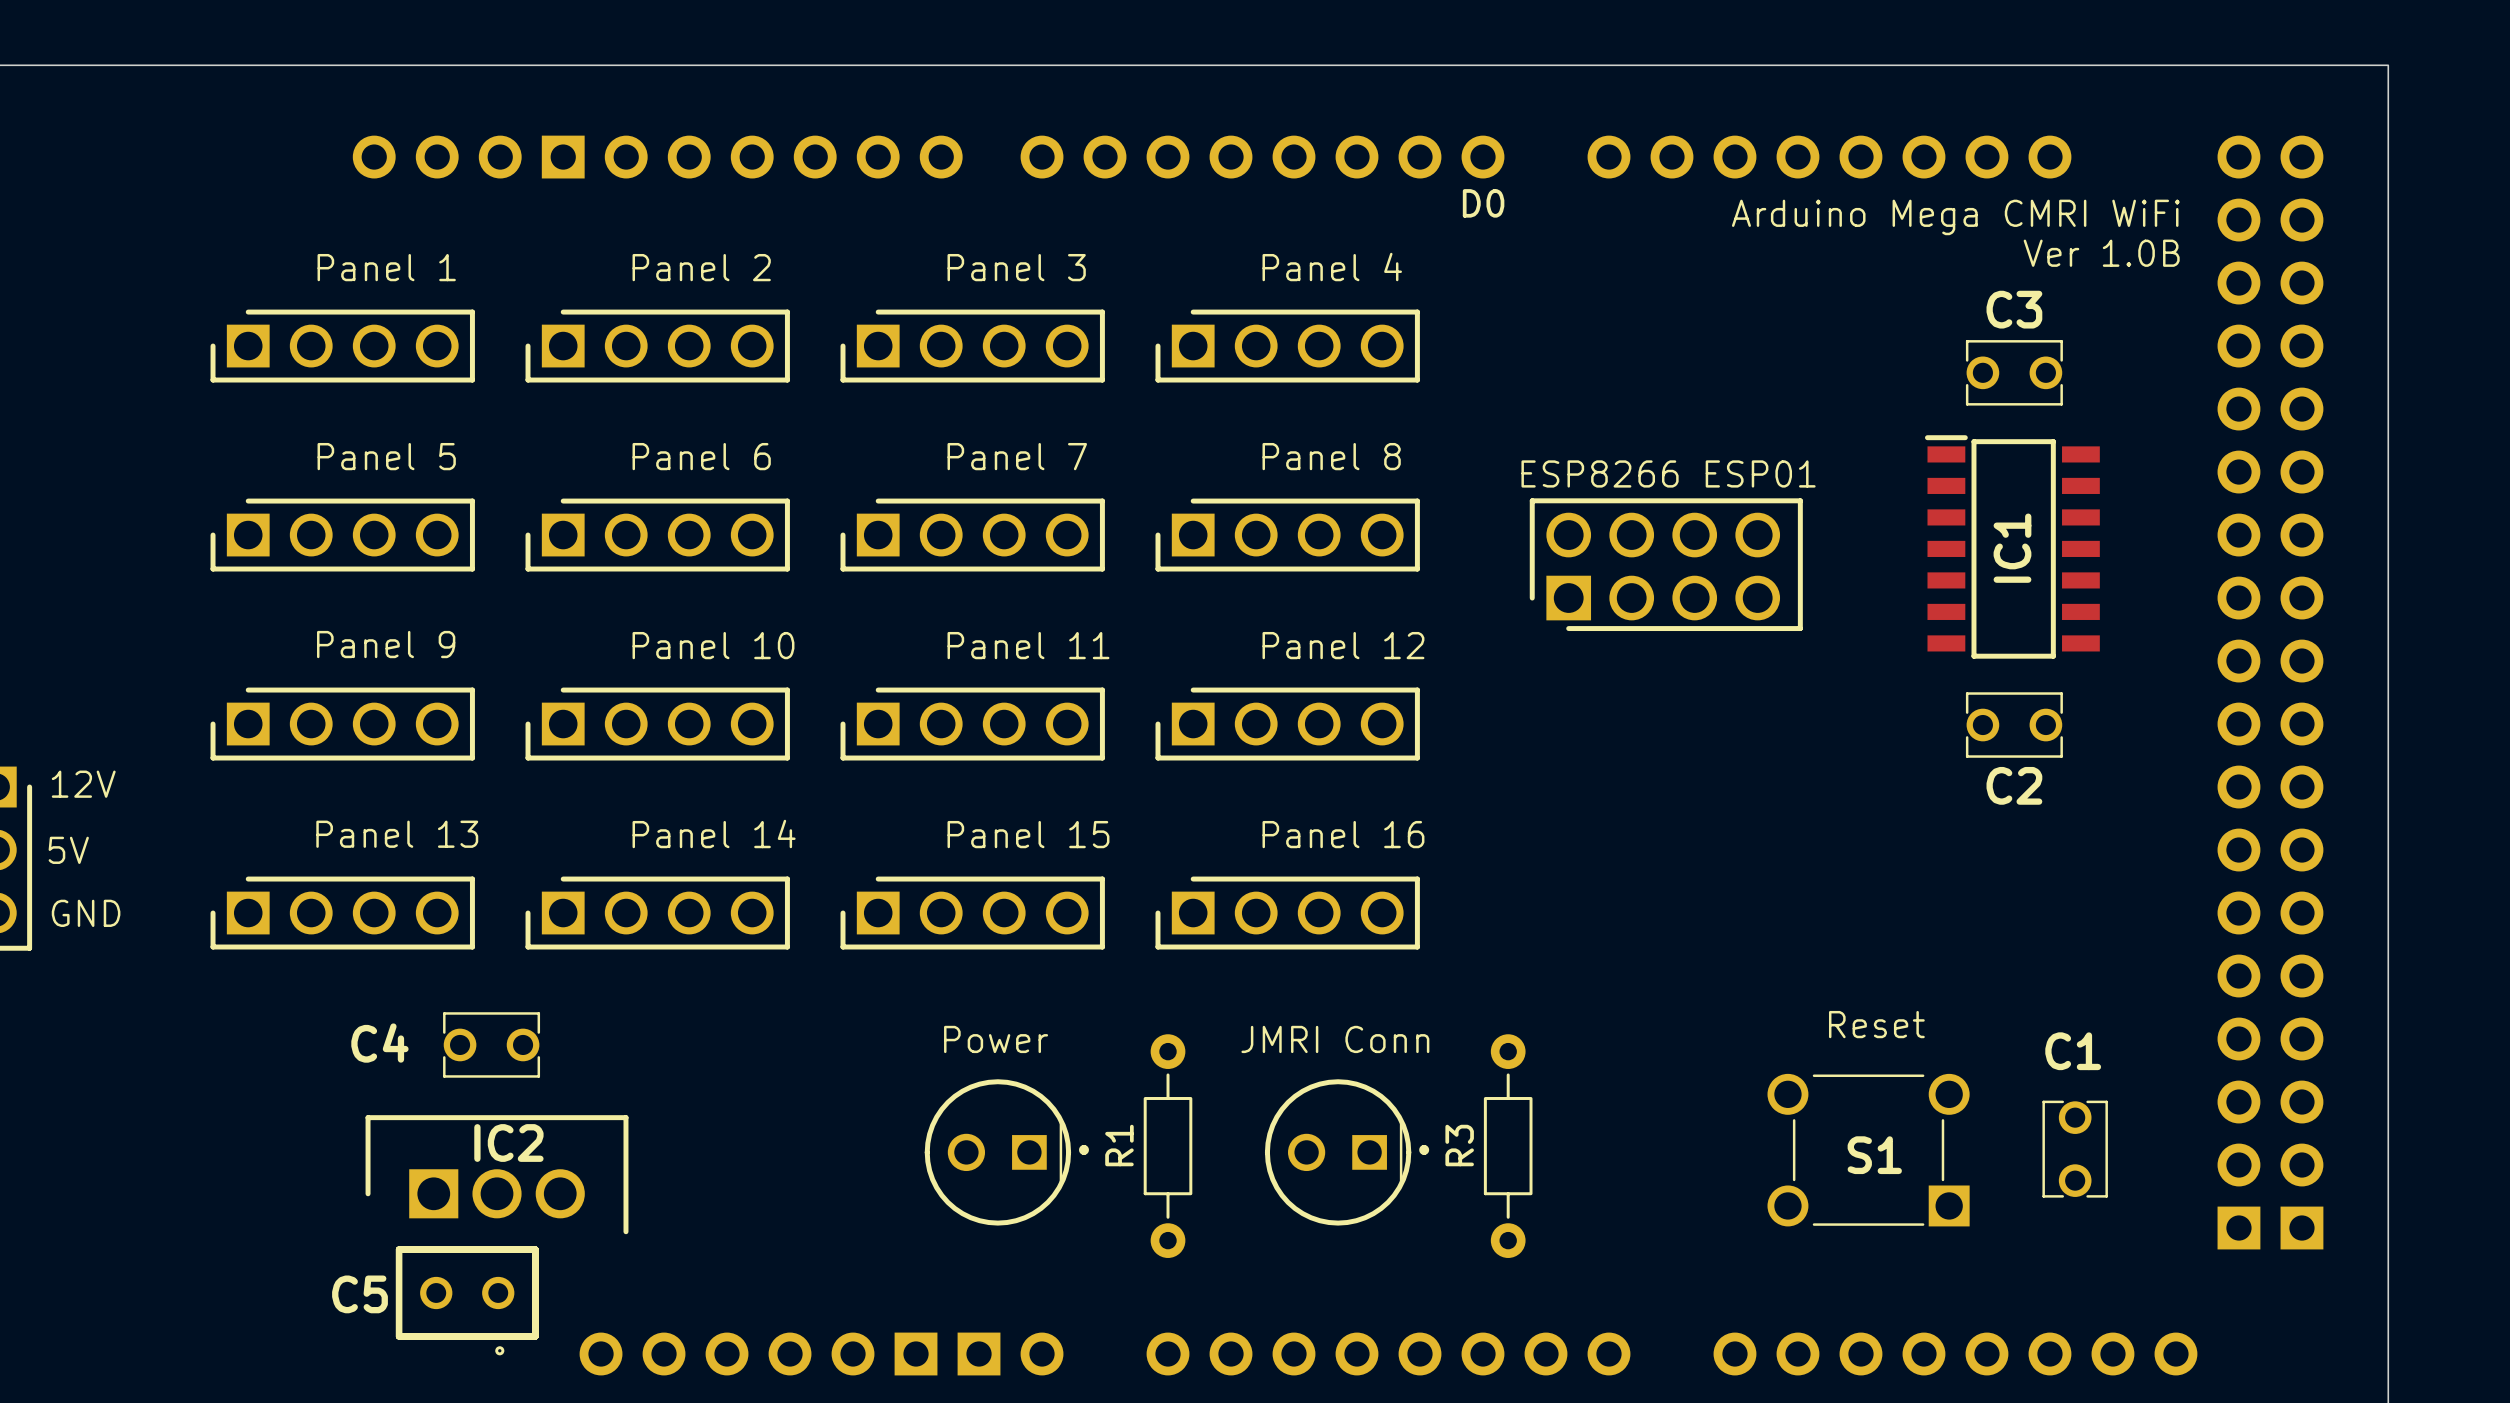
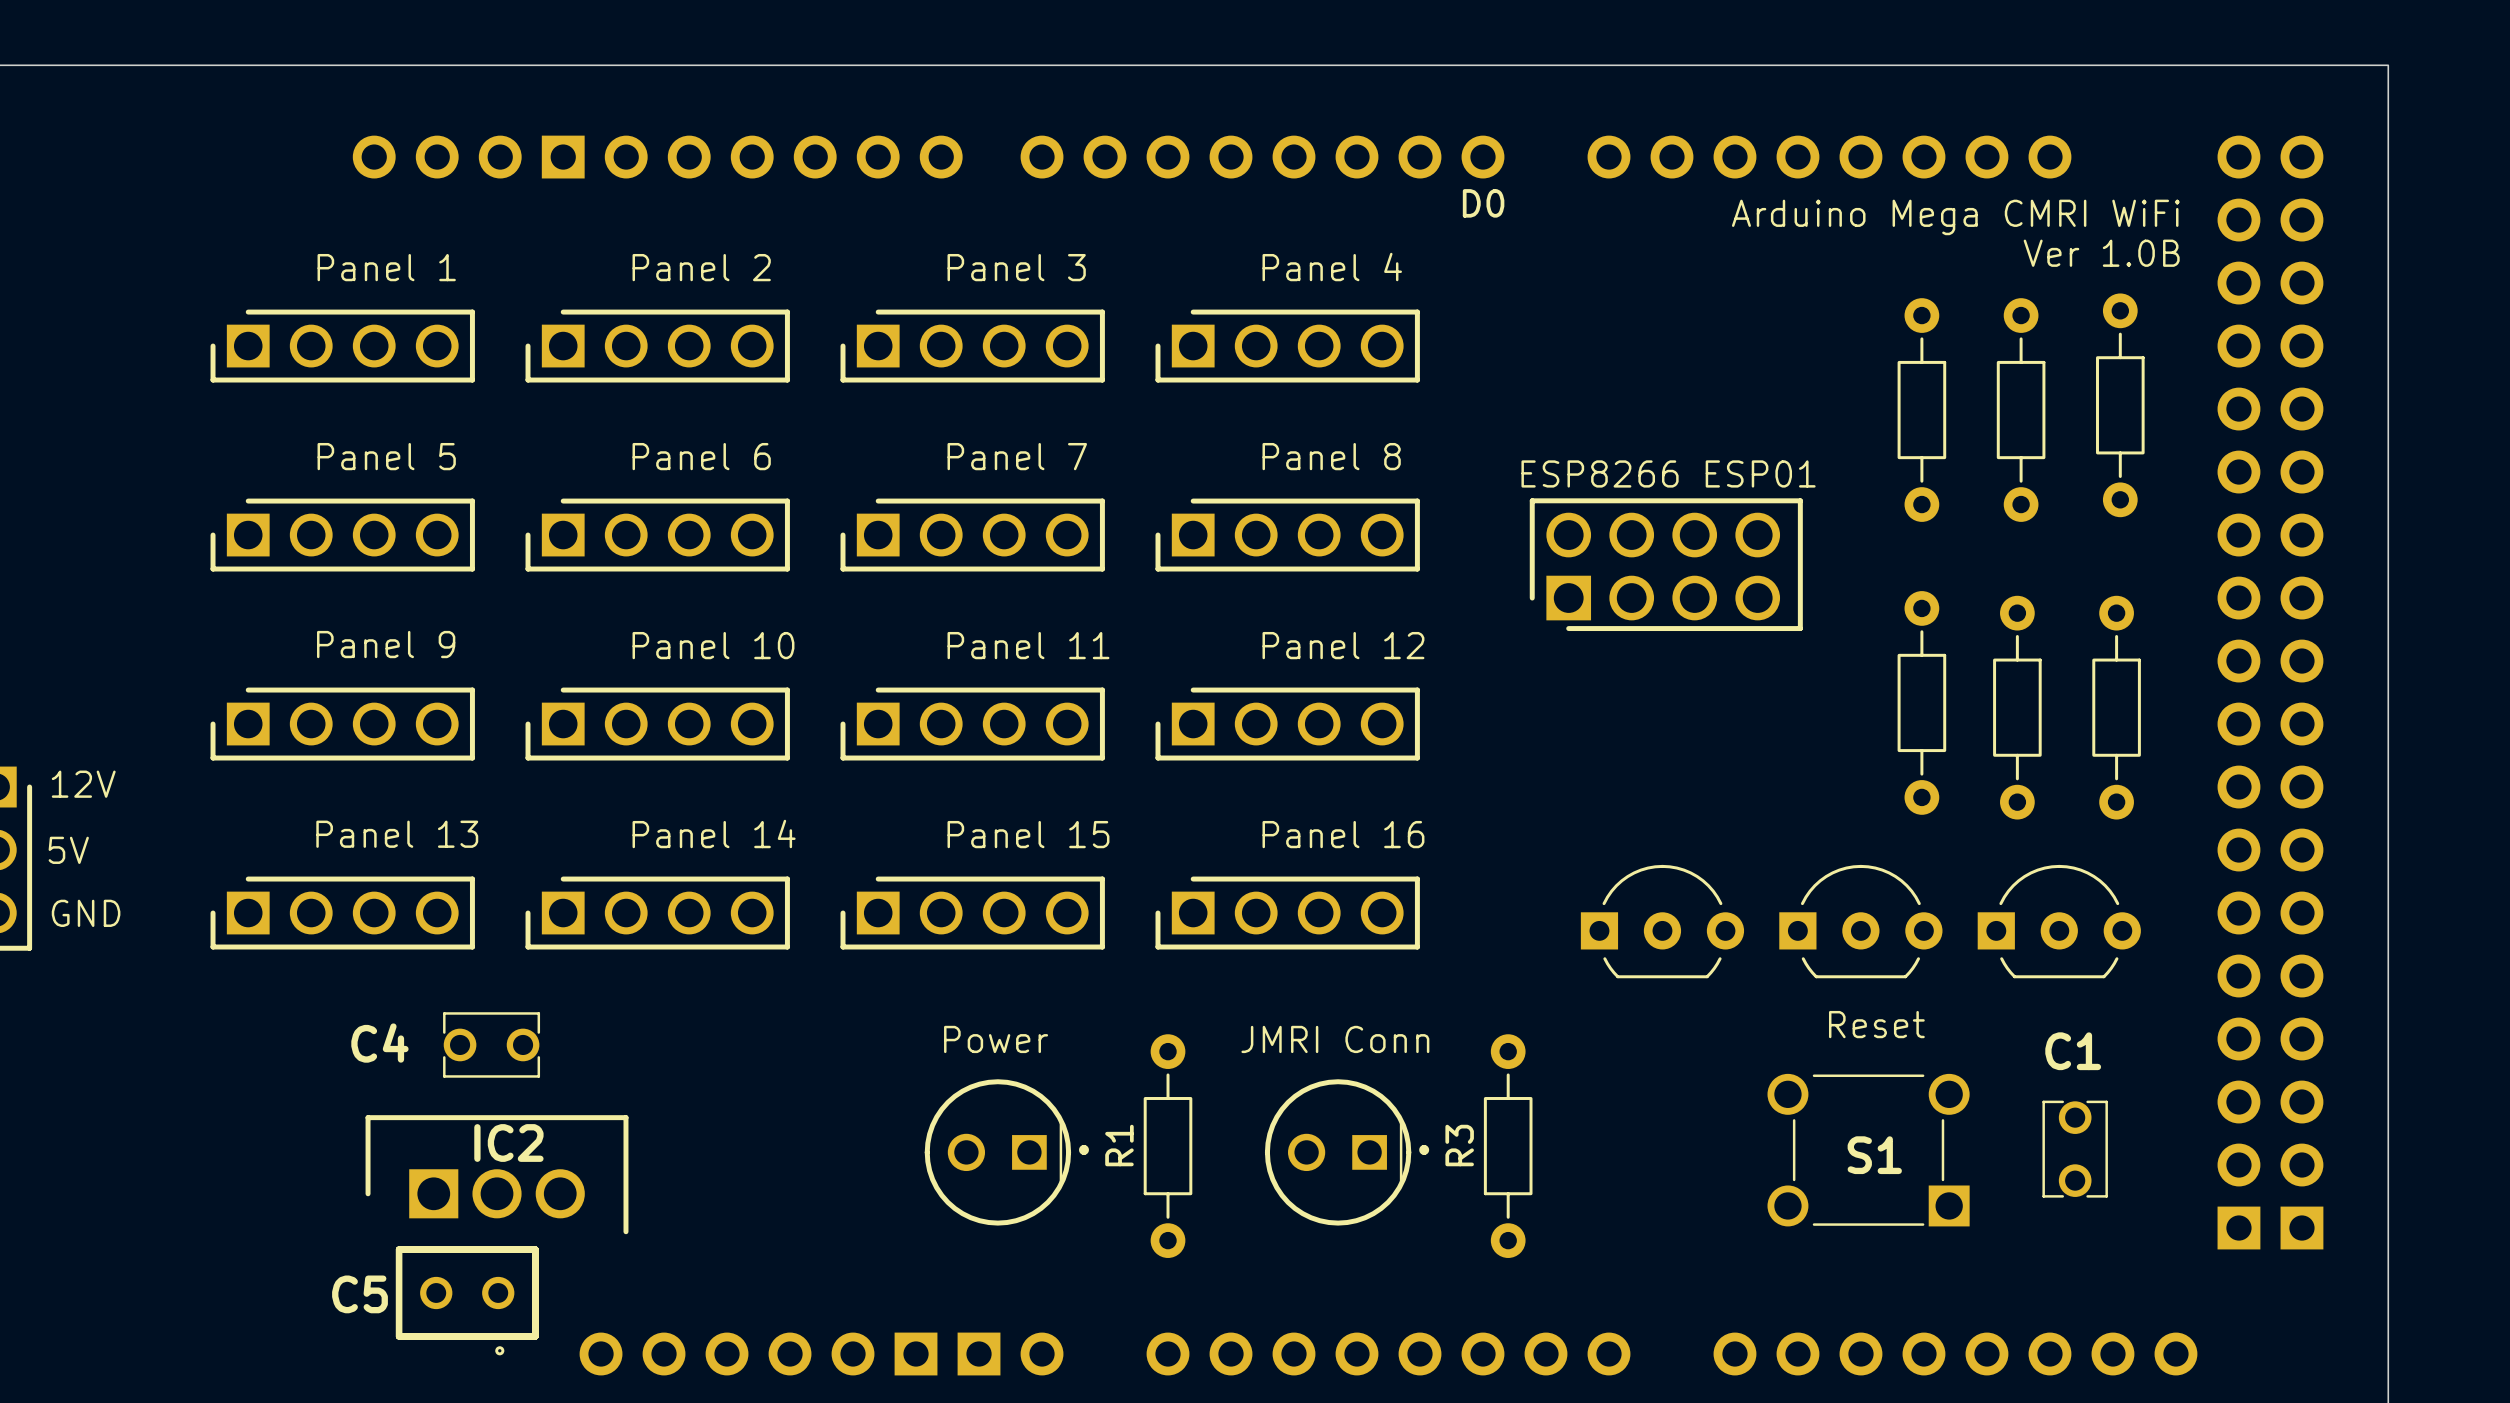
C3: (2014, 372) -> none
part: none -> (2120, 405)
part: none -> (1921, 410)
part: none -> (2021, 410)
IC1: (2012, 546) -> none
part: none -> (1921, 702)
part: none -> (2017, 707)
part: none -> (2116, 707)
C2: (2014, 725) -> none
part: none -> (1662, 921)
part: none -> (1860, 921)
part: none -> (2059, 921)

